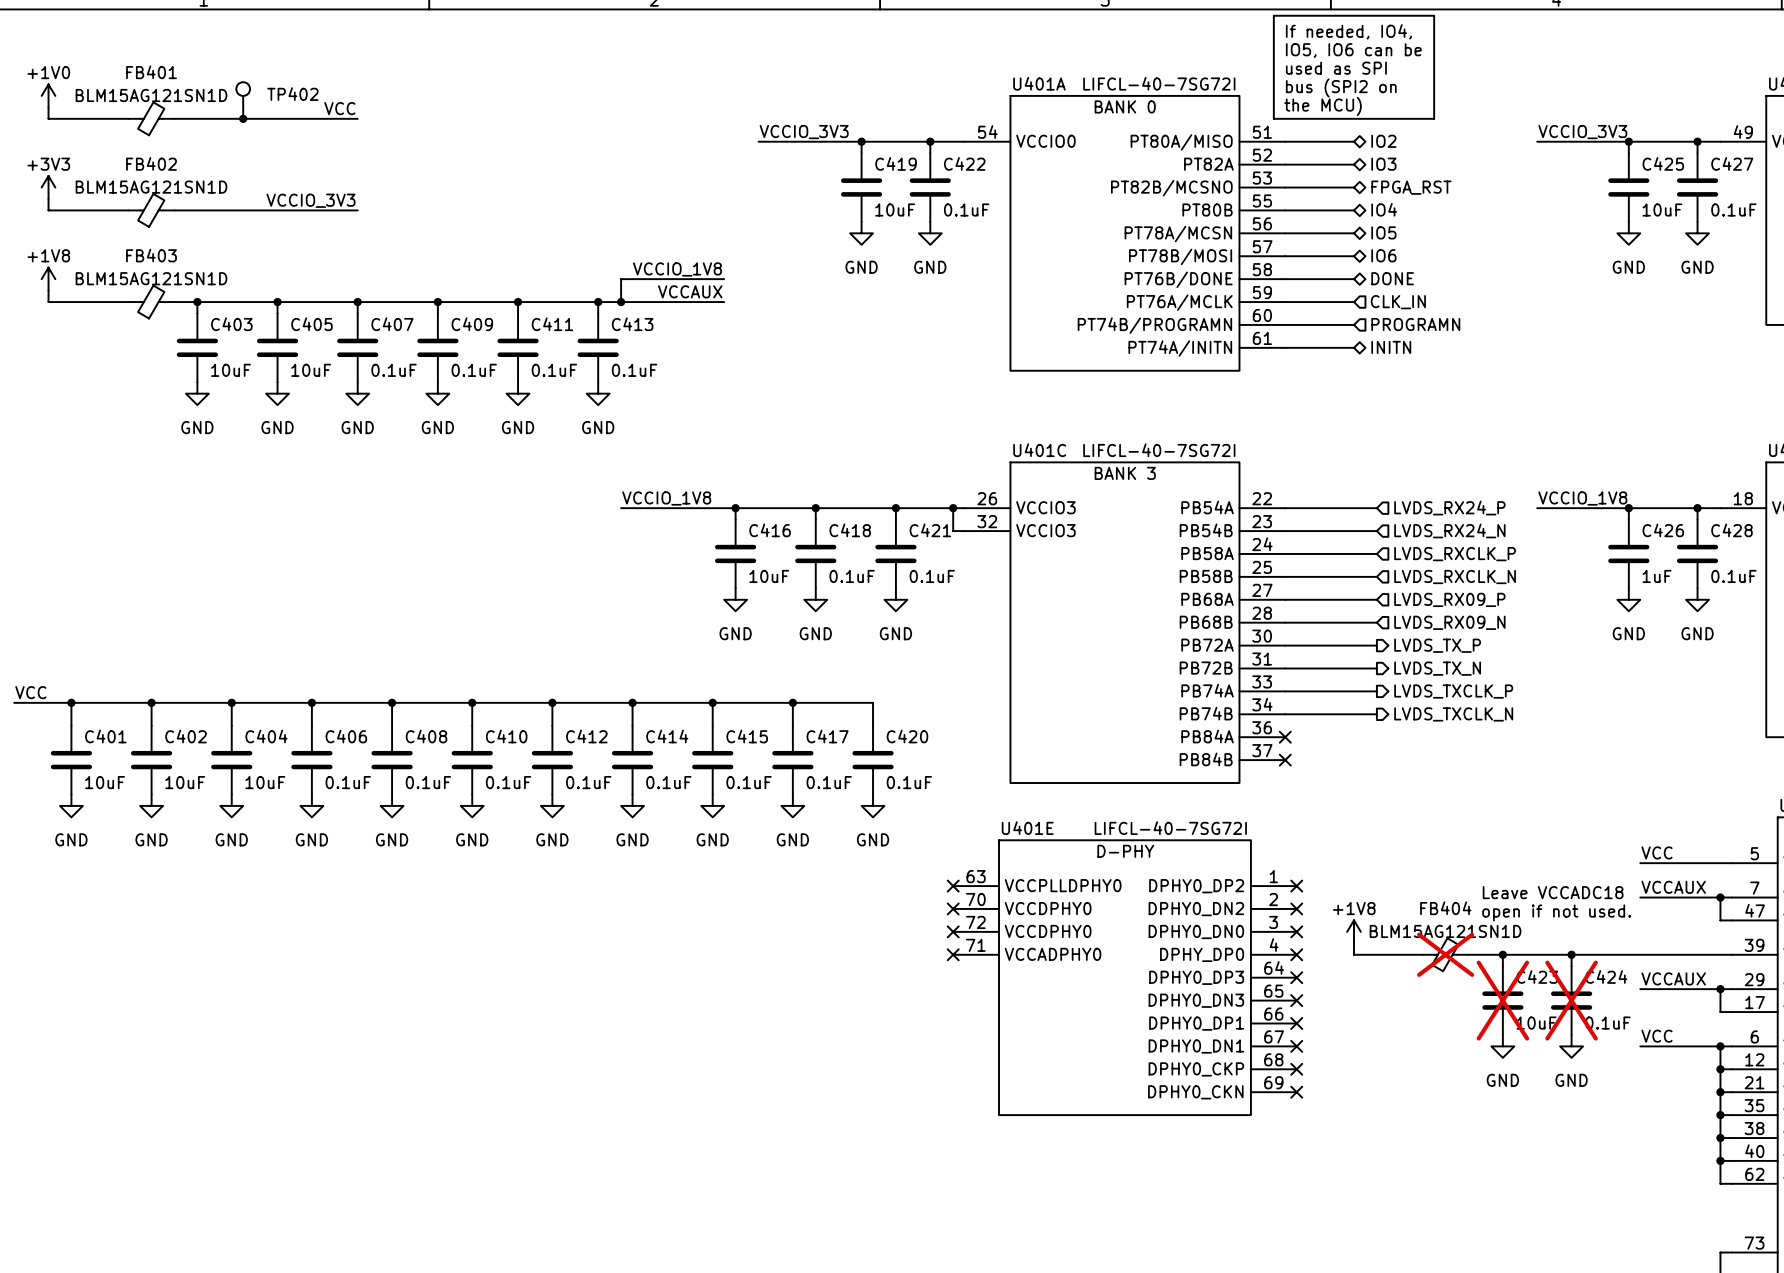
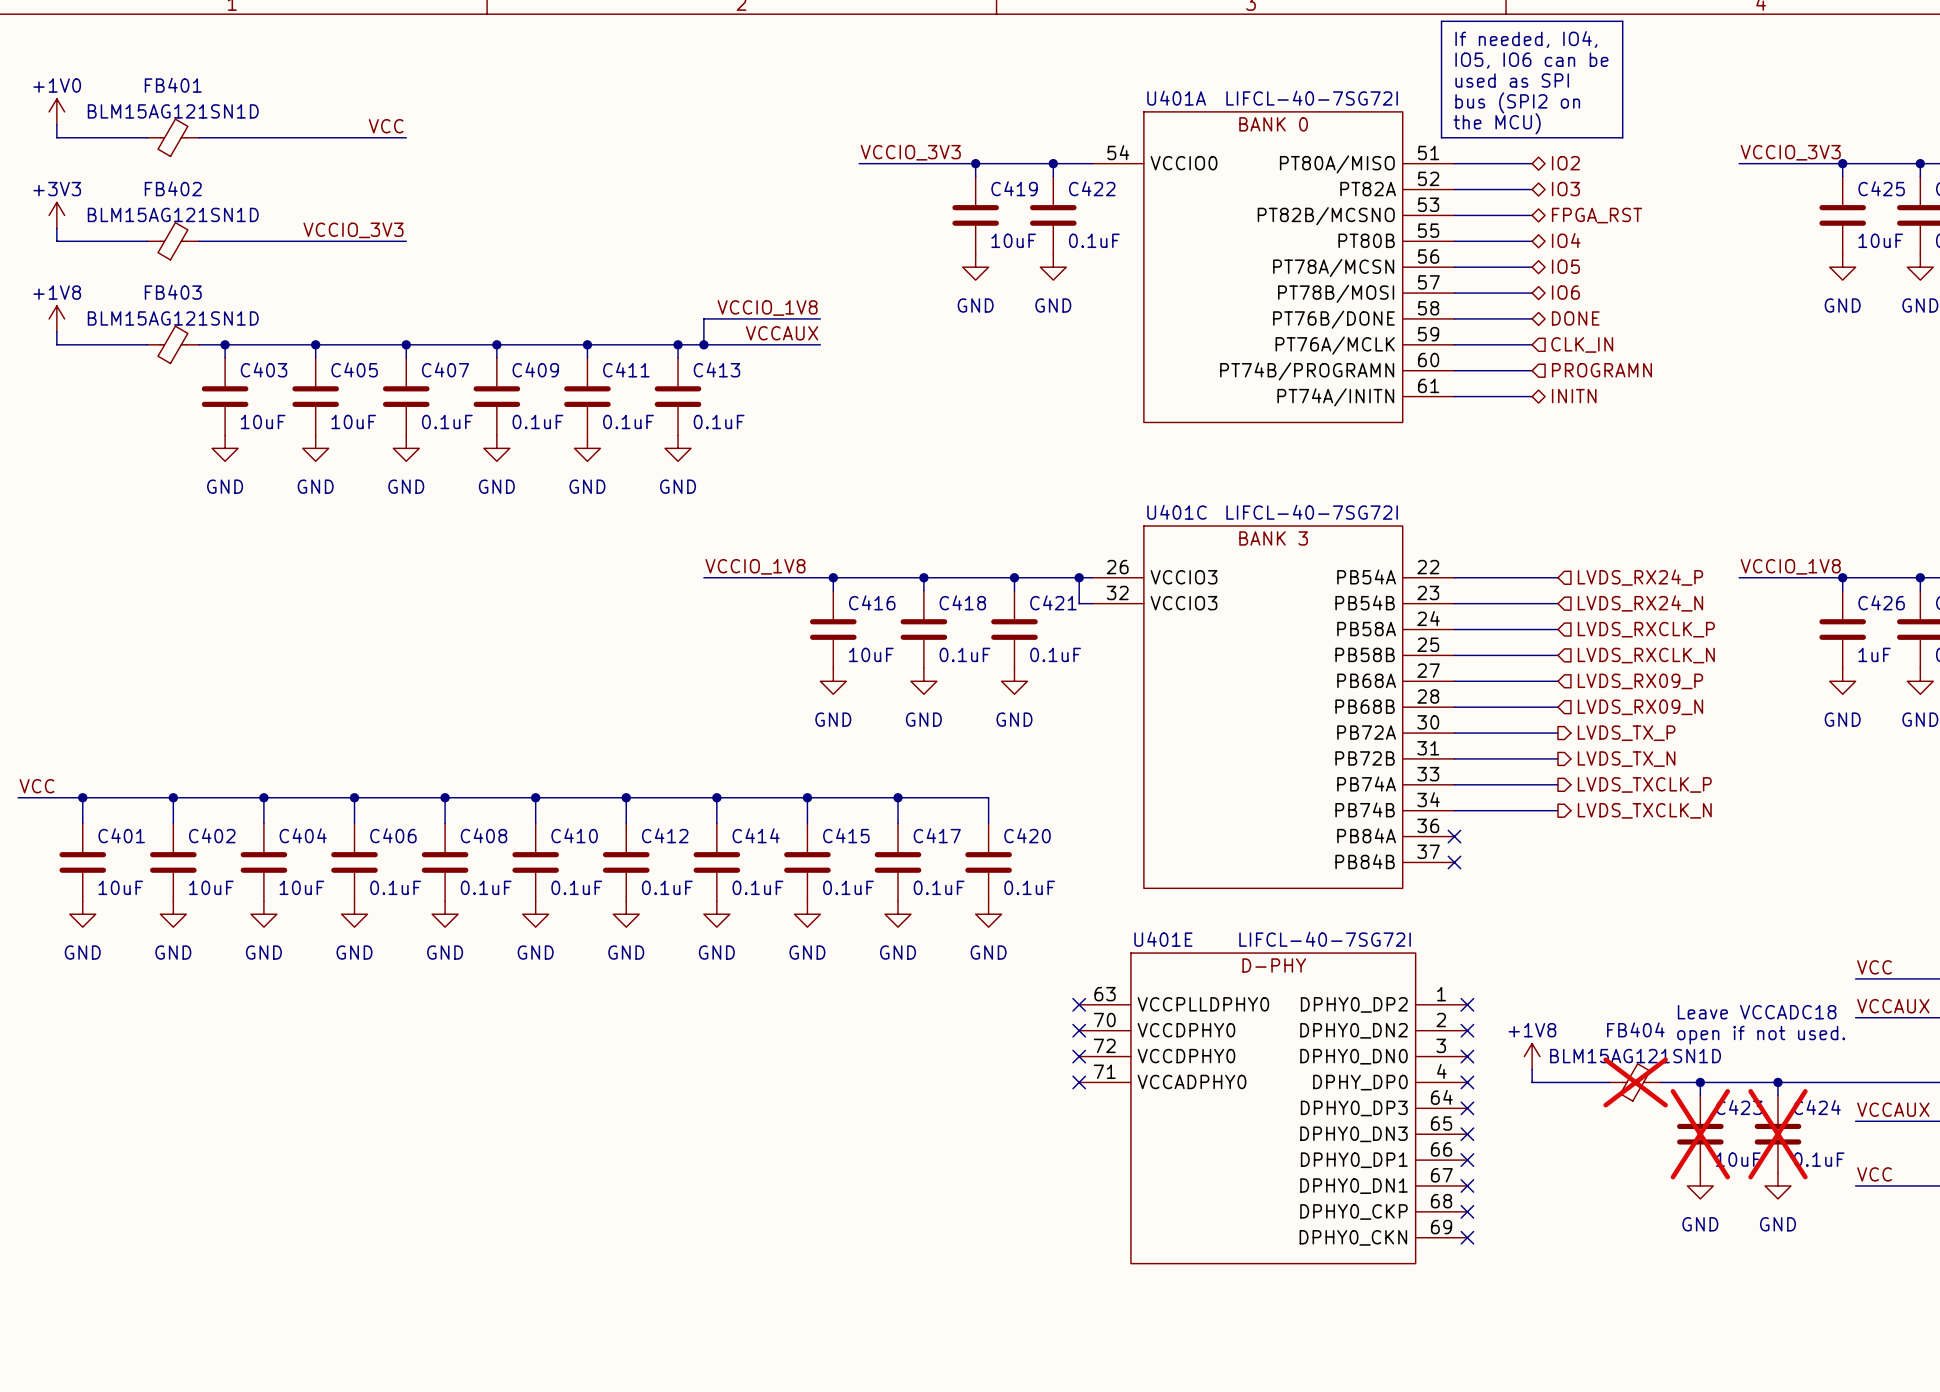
TP402: (243, 100) -> none
junction: (243, 118) -> none

